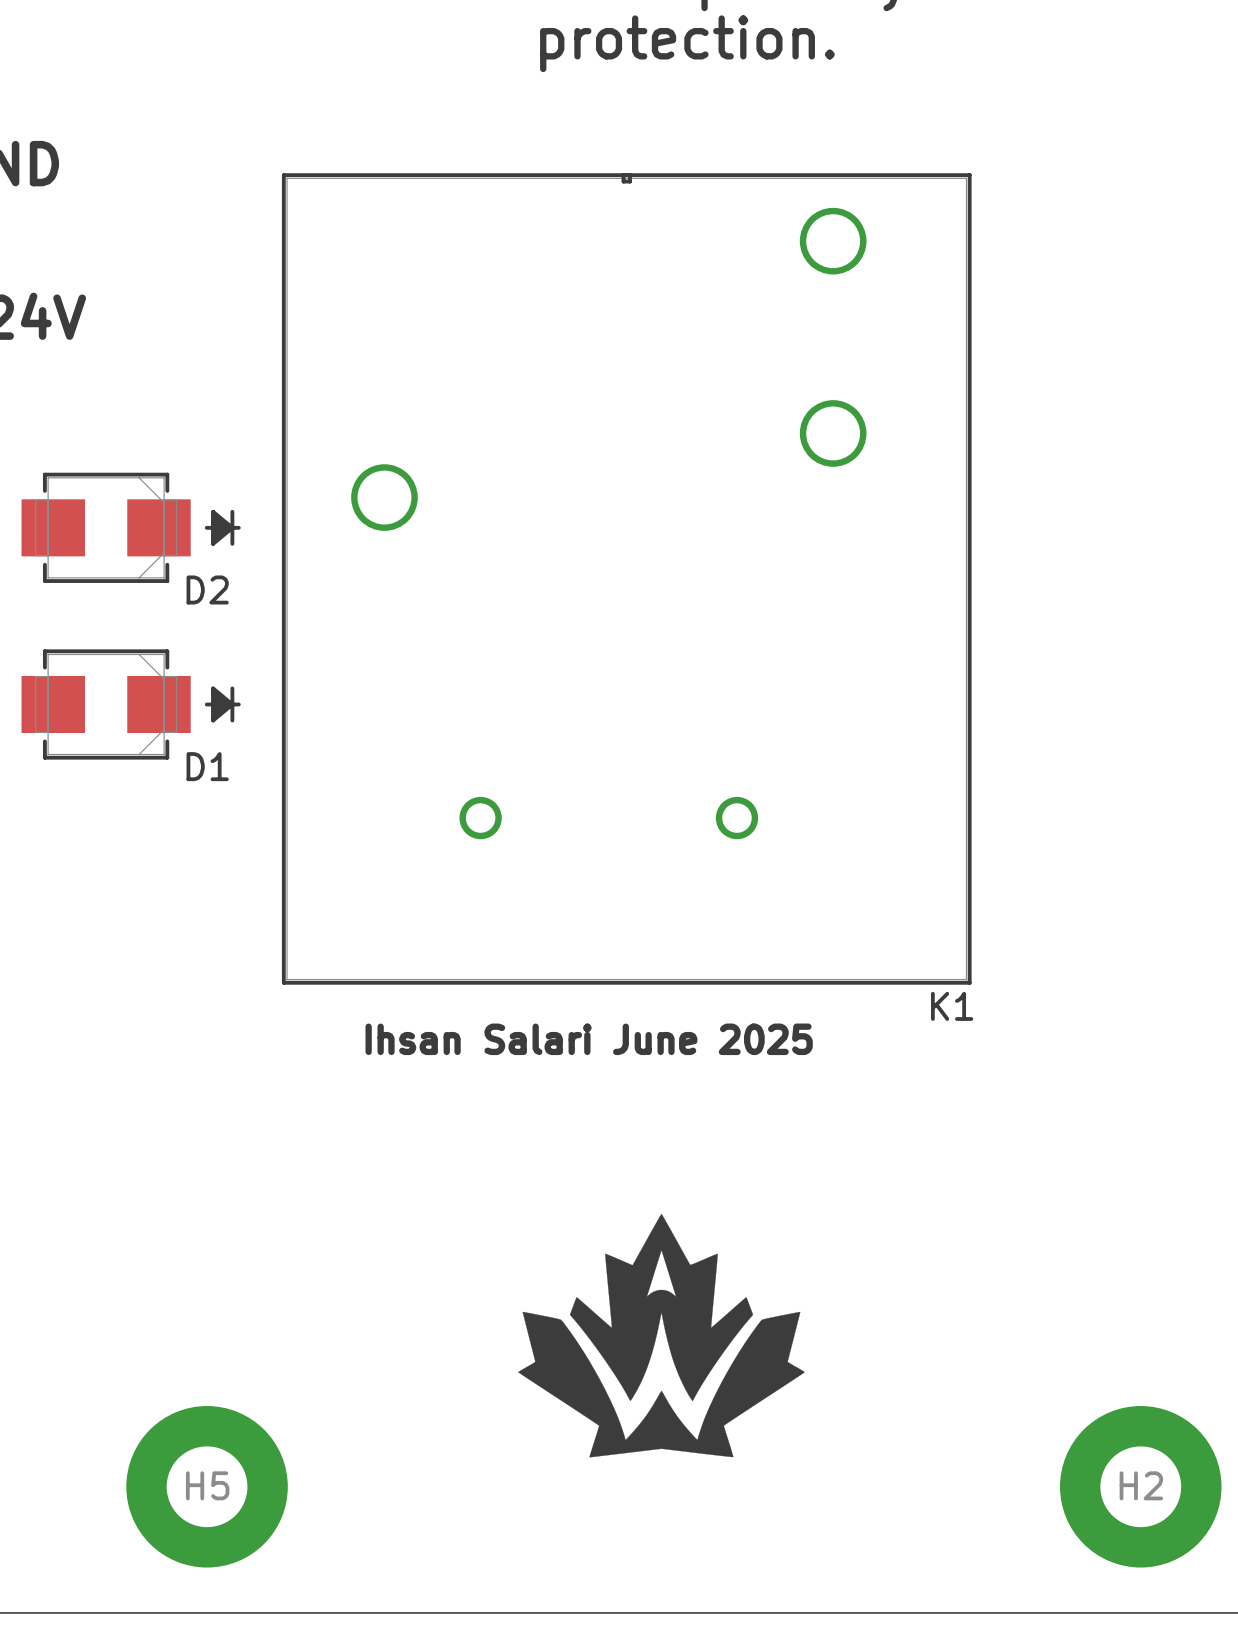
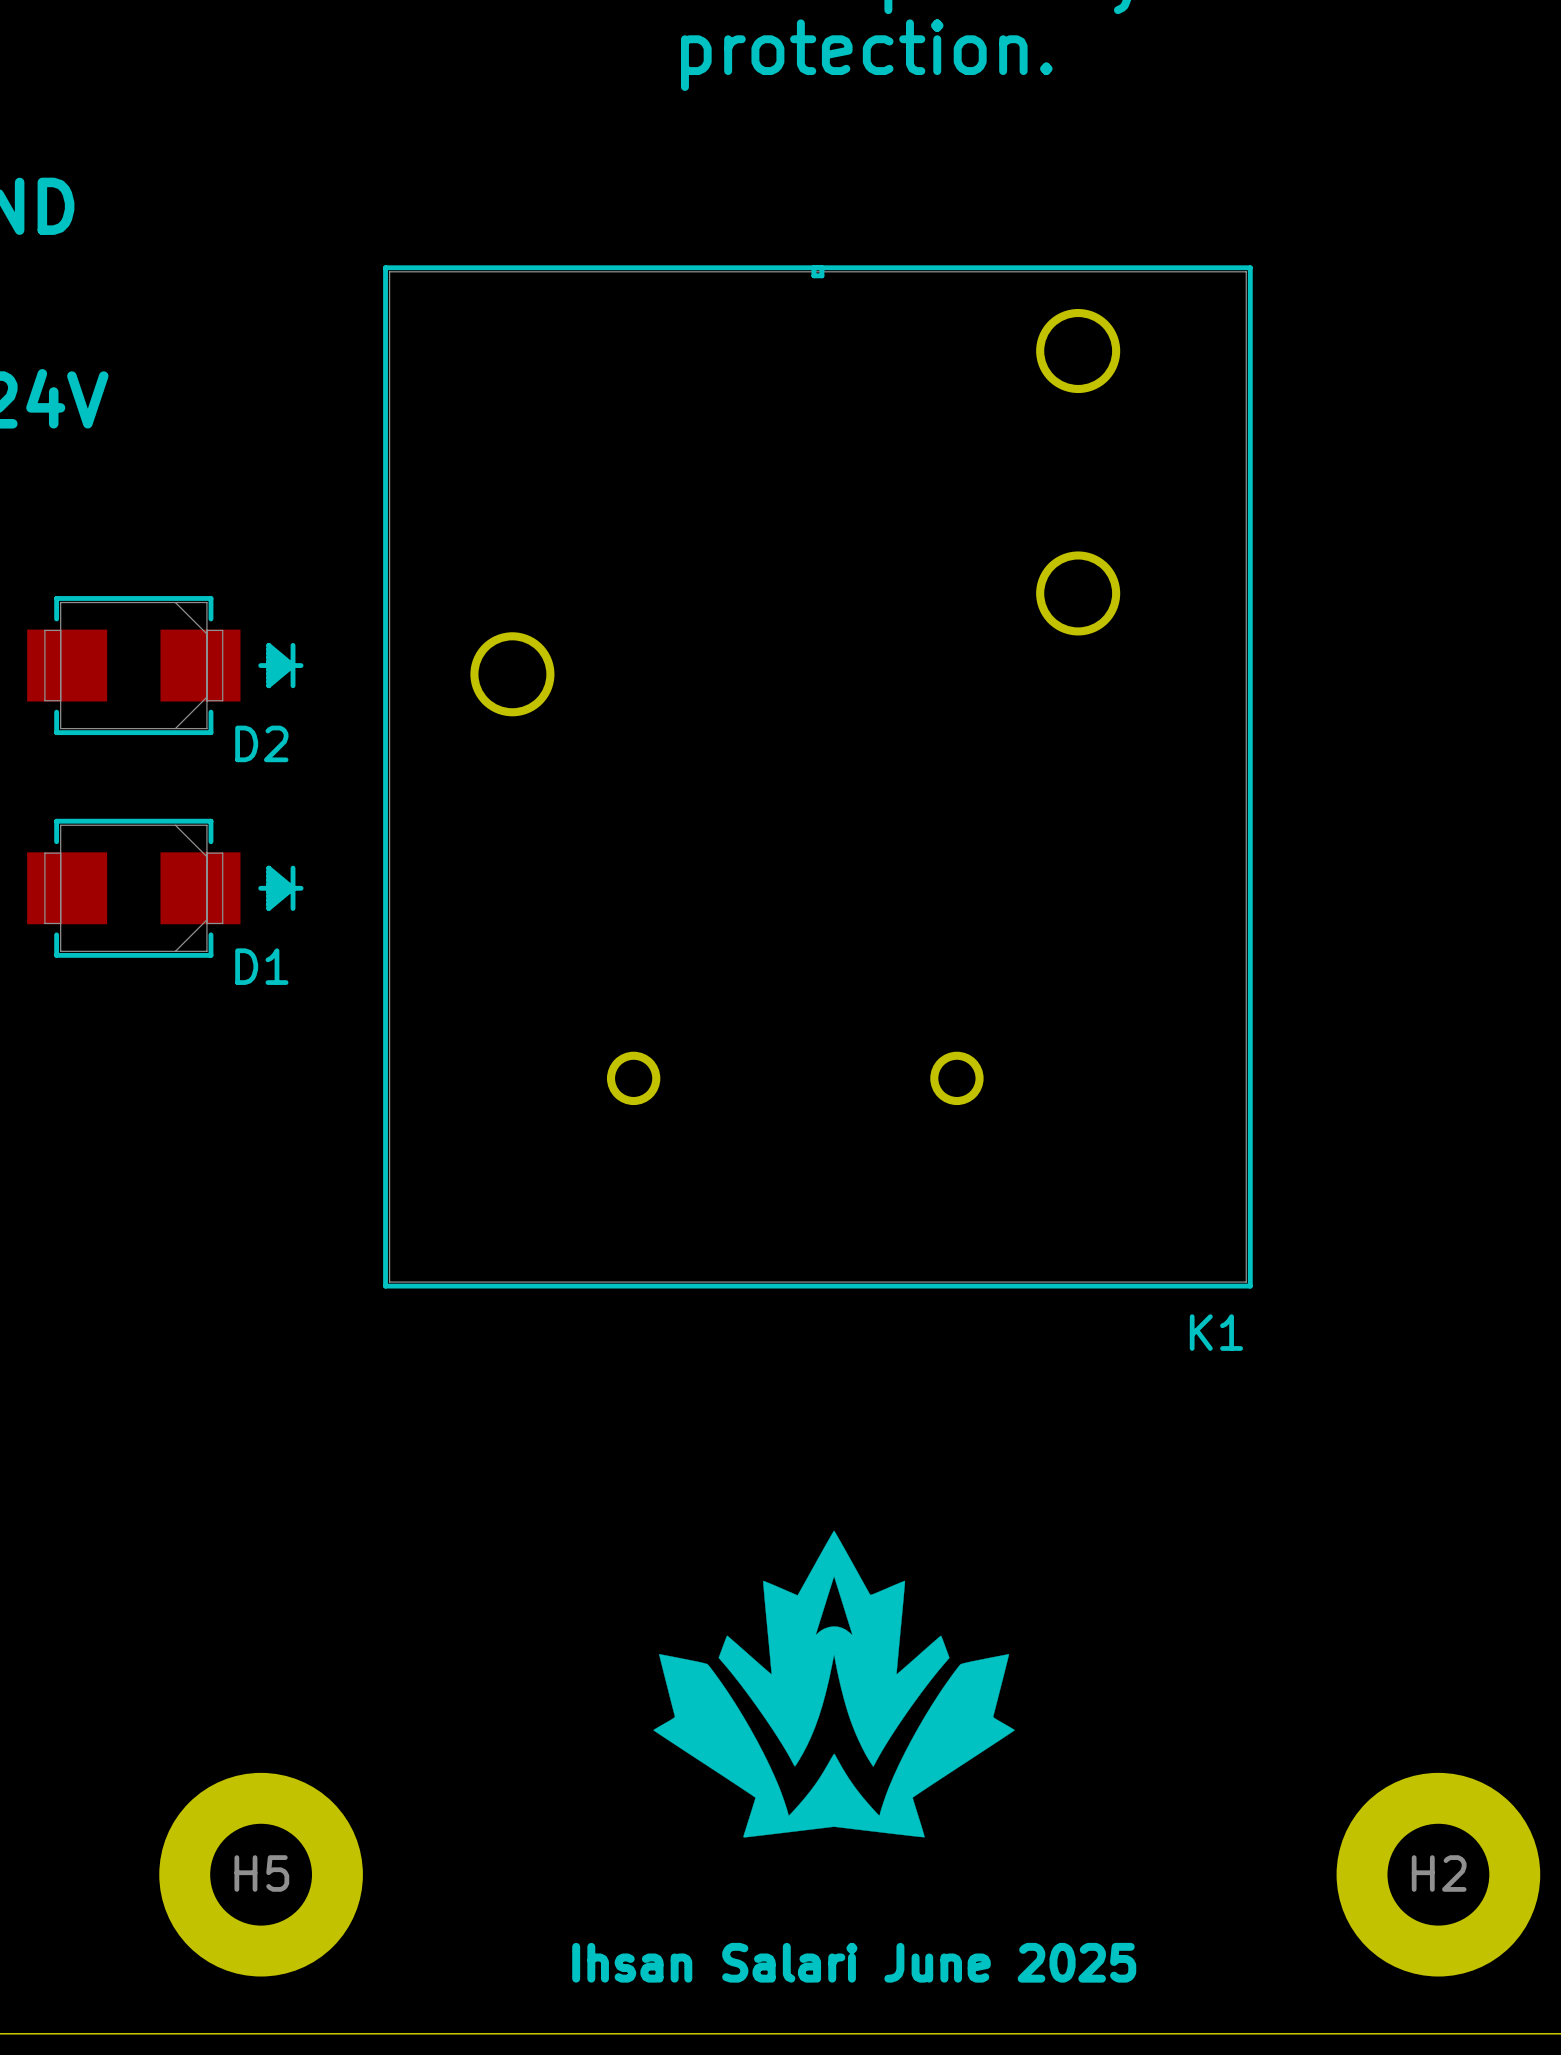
K1 position: (626, 578) -> (817, 776)
K1 name position: K1 (952, 1006) -> K1 (1216, 1332)
text position: Ihsan Salari June 2025 (589, 1039) -> Ihsan Salari June 2025 (854, 1962)

